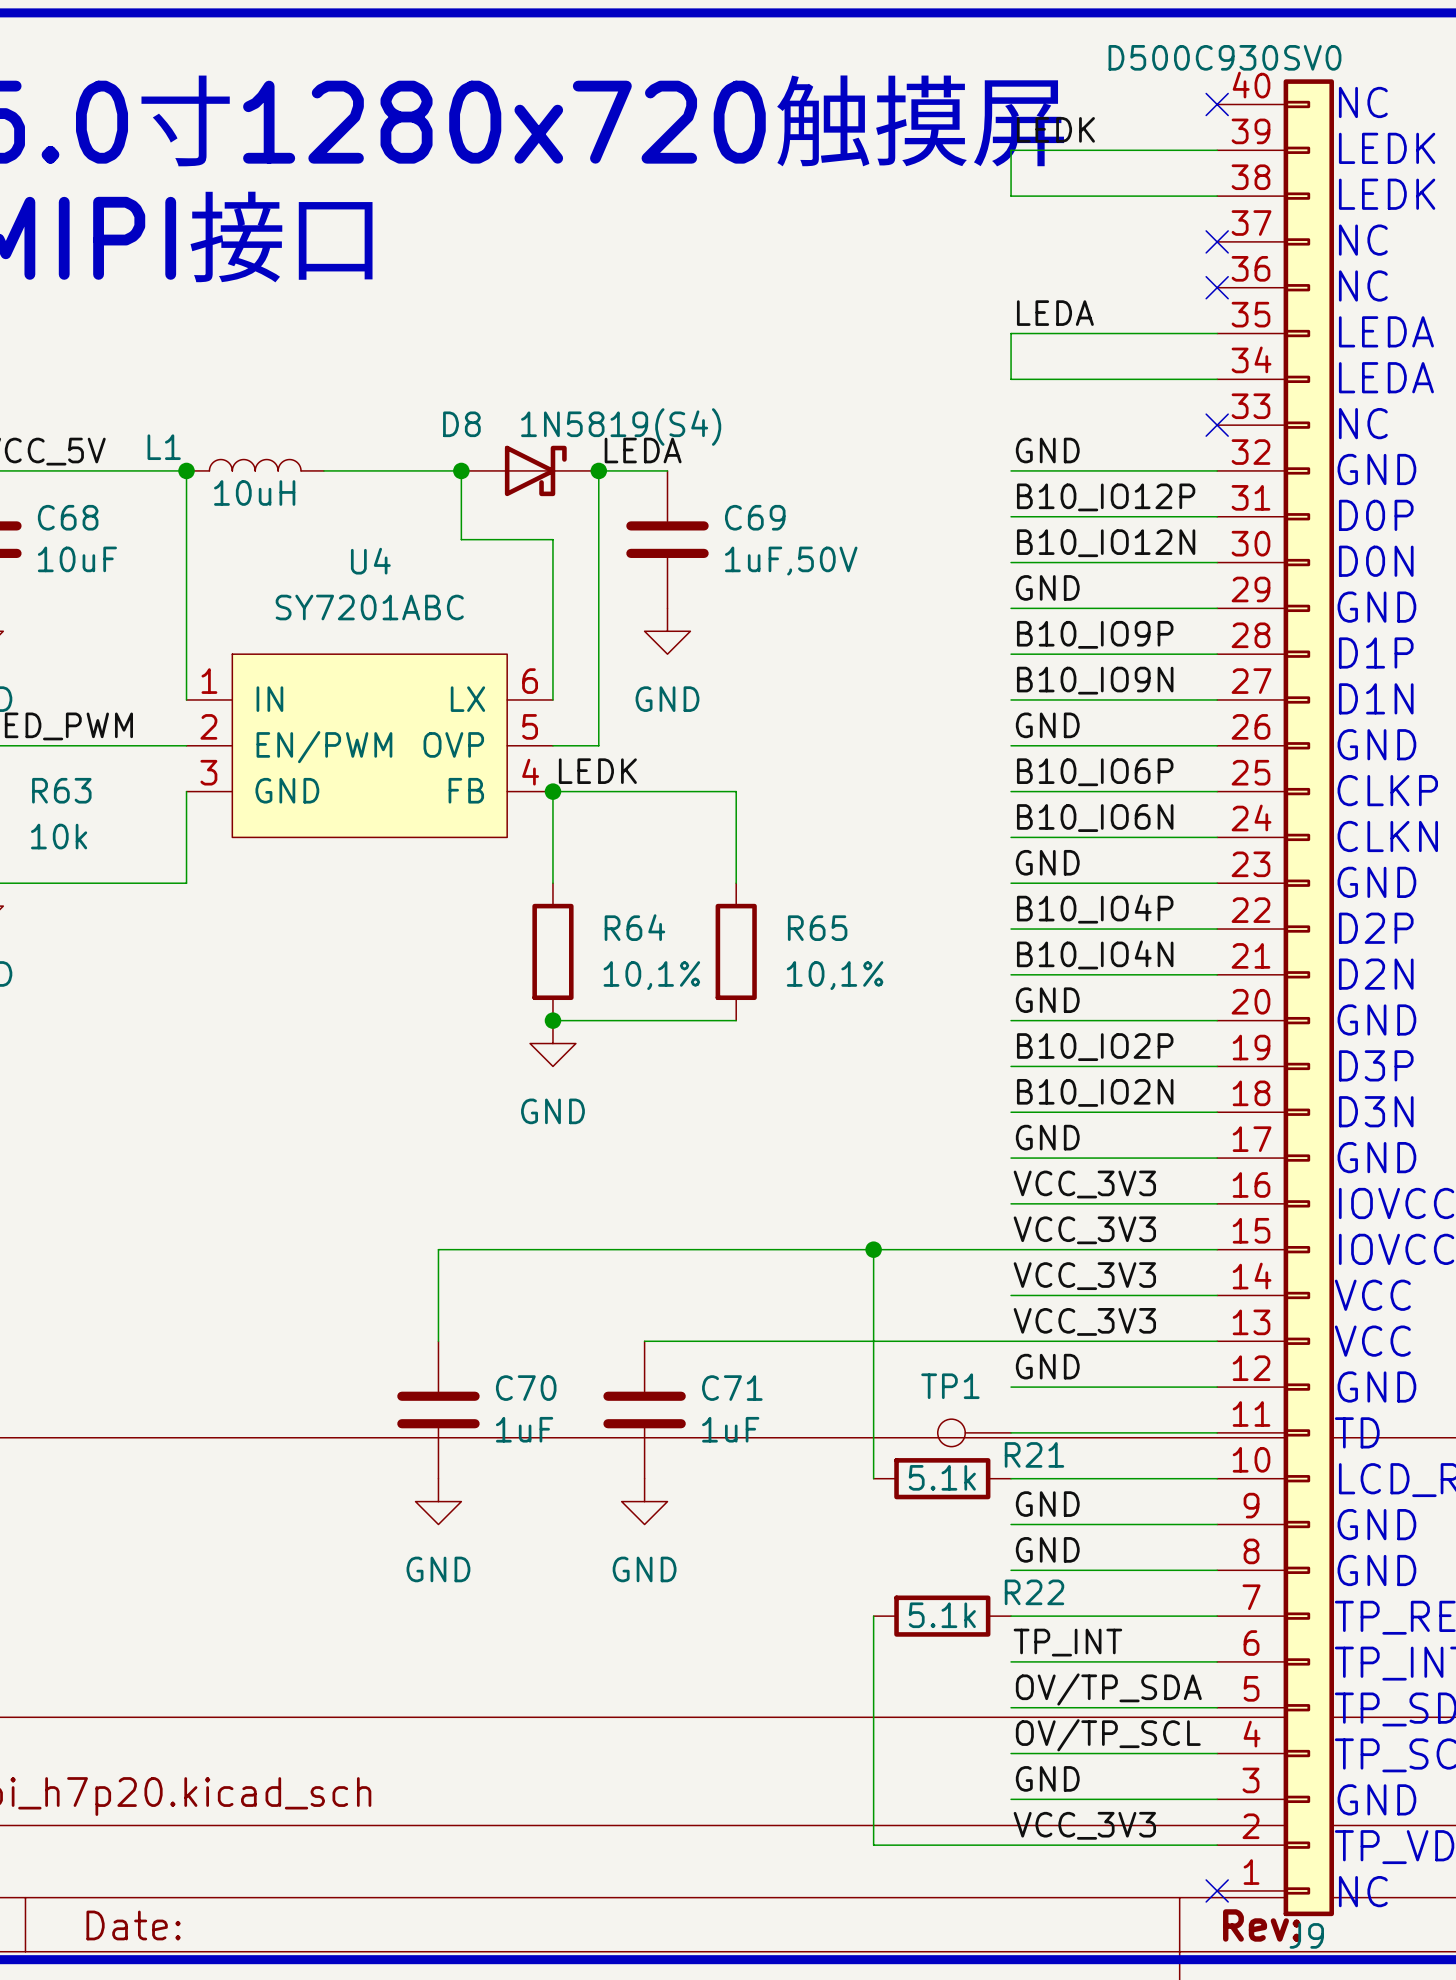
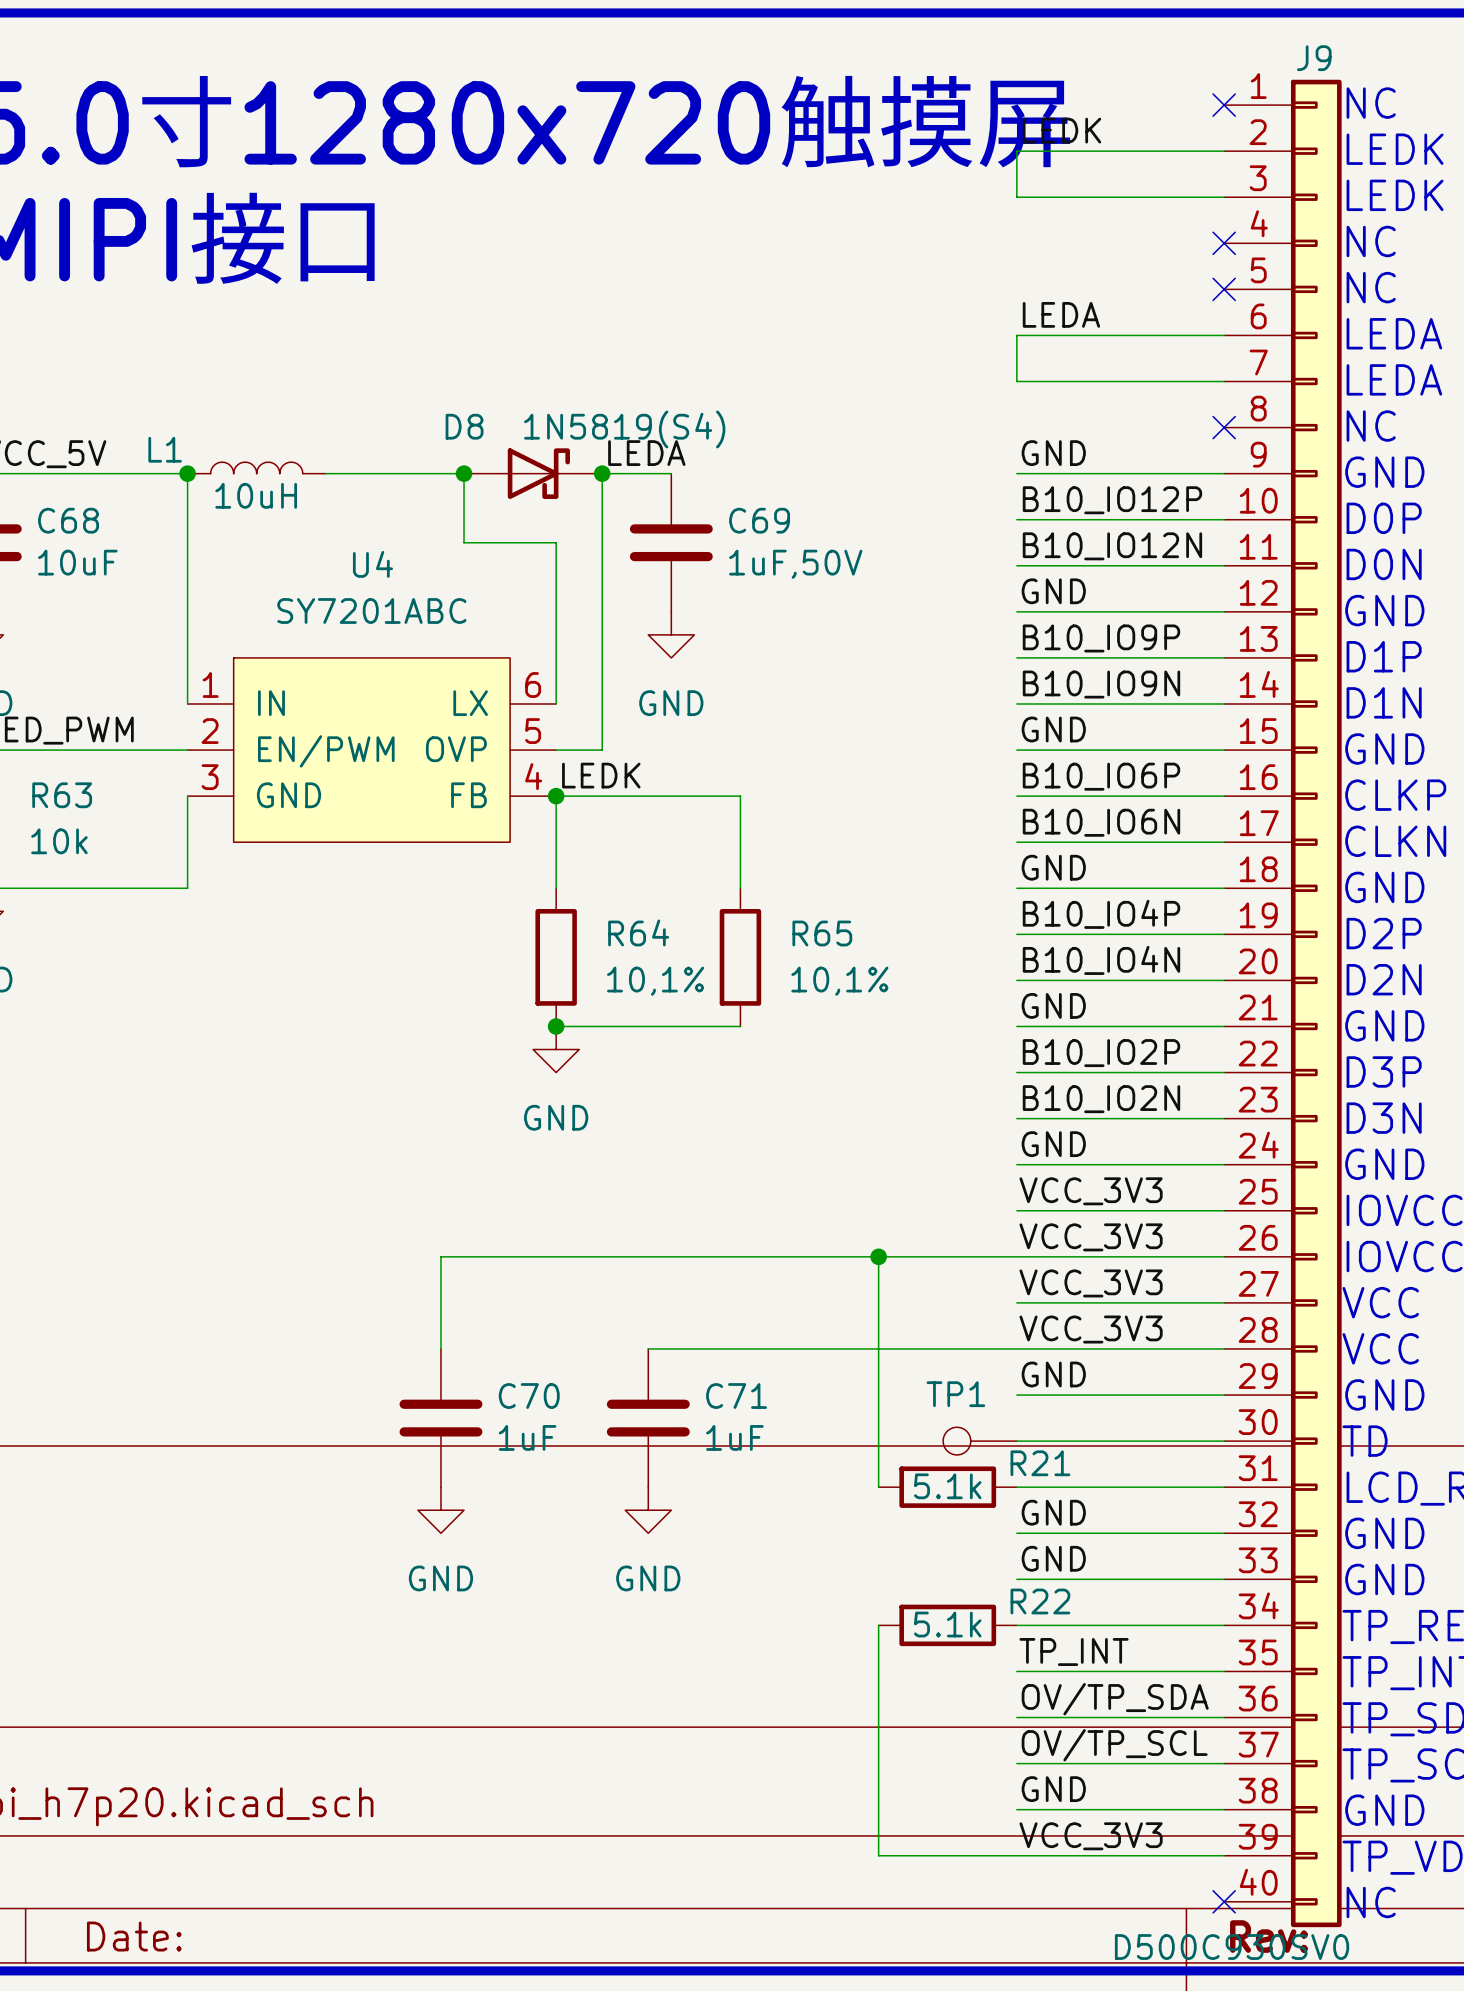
J9 flip: as is (1308, 997) -> up-down (1316, 1003)

